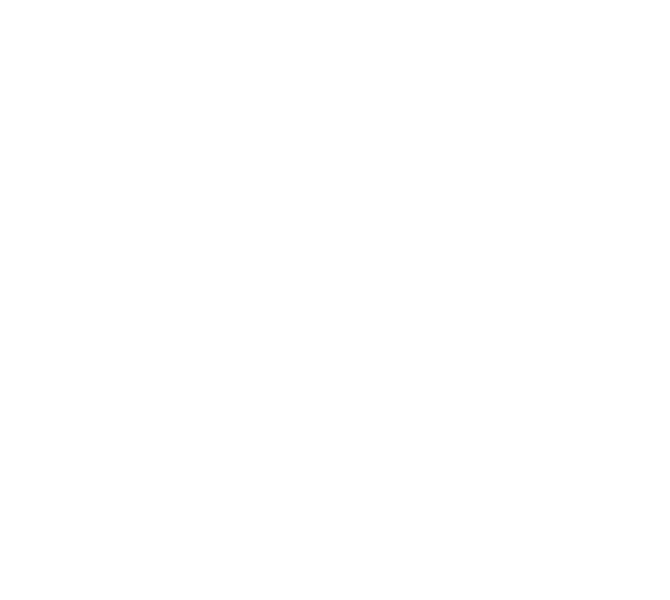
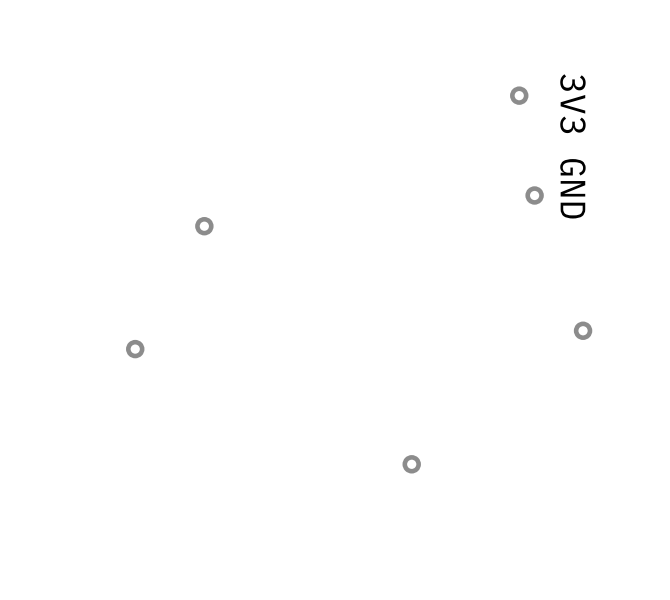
via: none -> (519, 95)
text: none -> 3V3 (572, 103)
text: none -> GND (572, 188)
via: none -> (534, 195)
via: none -> (204, 226)
via: none -> (583, 330)
via: none -> (135, 349)
via: none -> (411, 464)

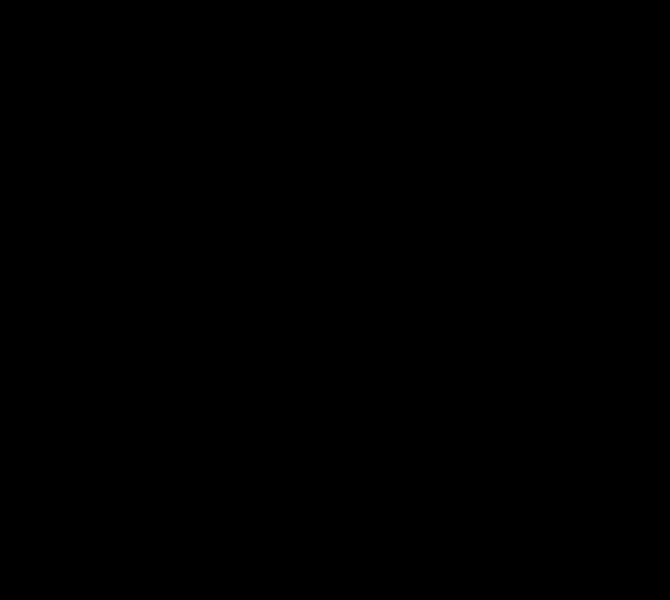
via: (519, 95) -> none
text: 3V3 (572, 103) -> none
text: GND (572, 188) -> none
via: (534, 195) -> none
via: (204, 226) -> none
via: (583, 330) -> none
via: (135, 349) -> none
via: (411, 464) -> none

